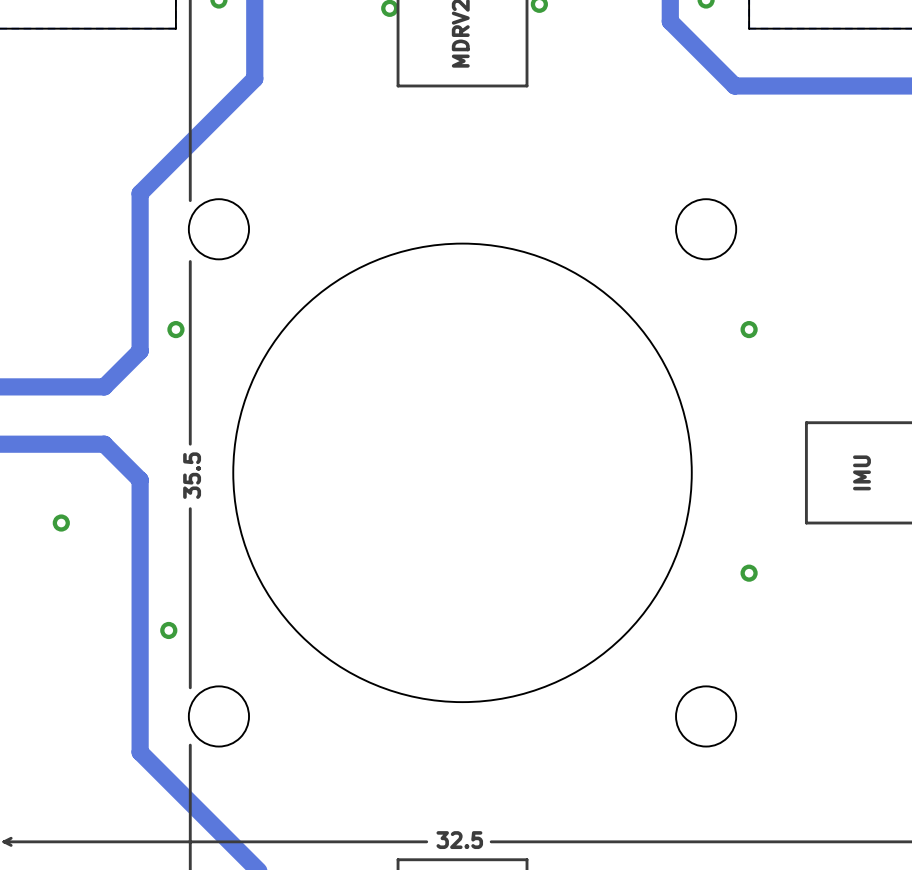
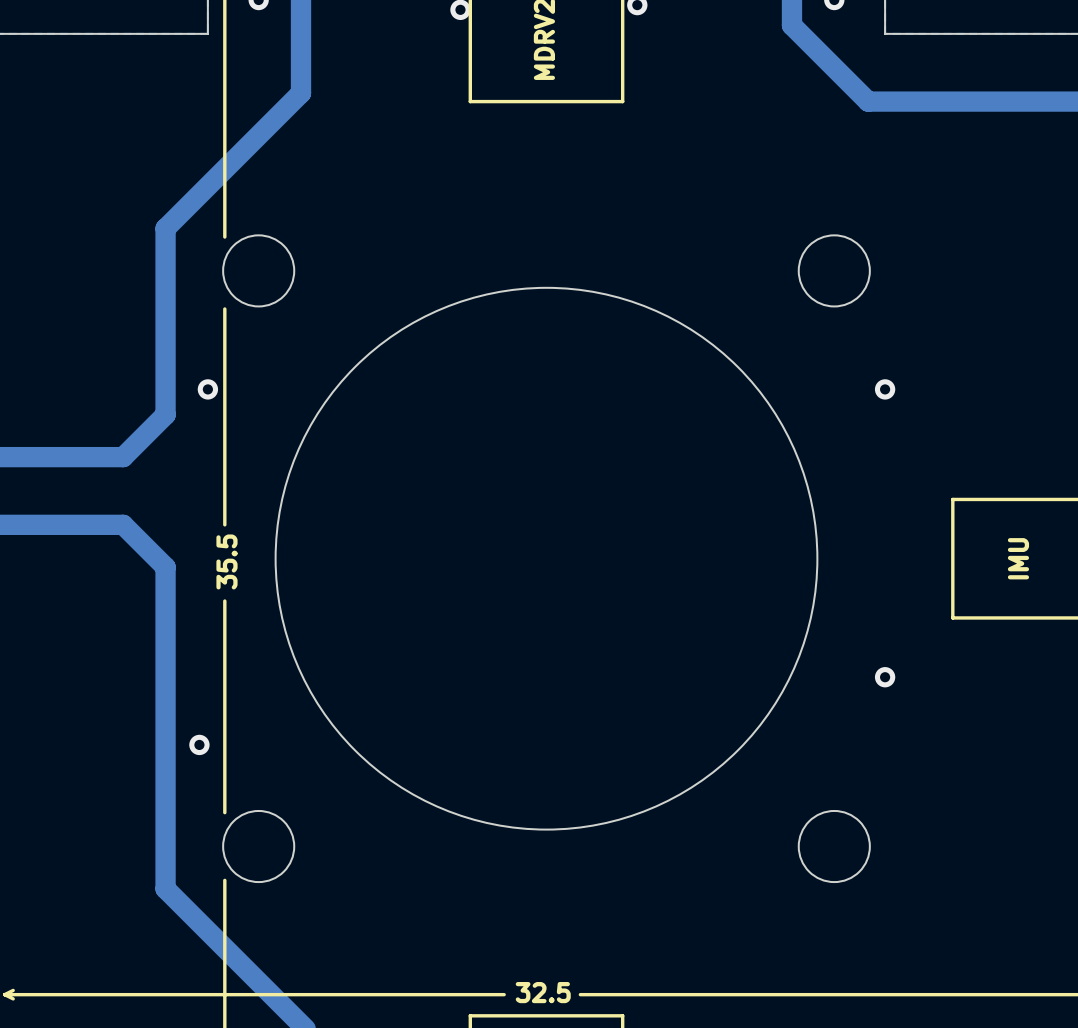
via: (61, 523) -> none

